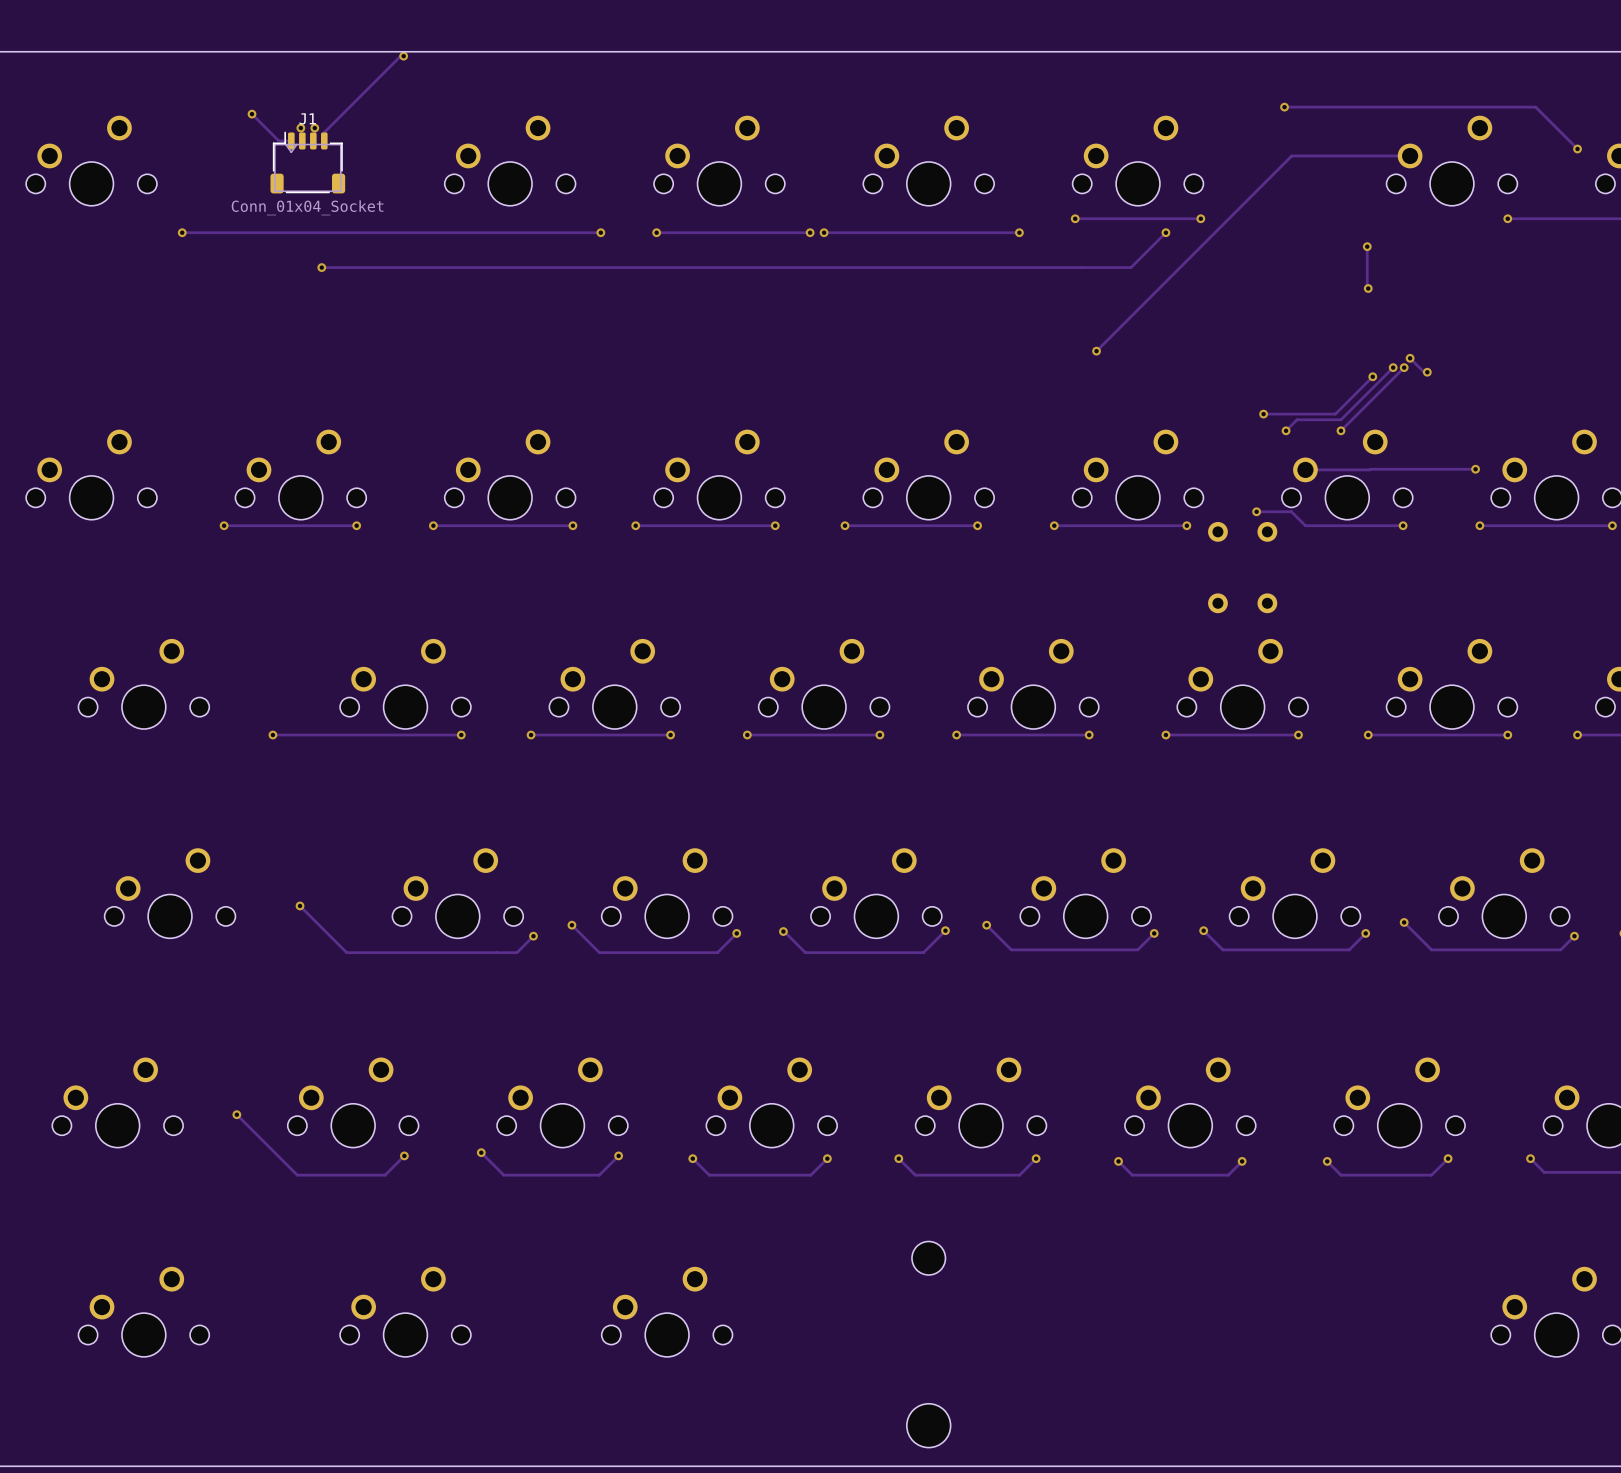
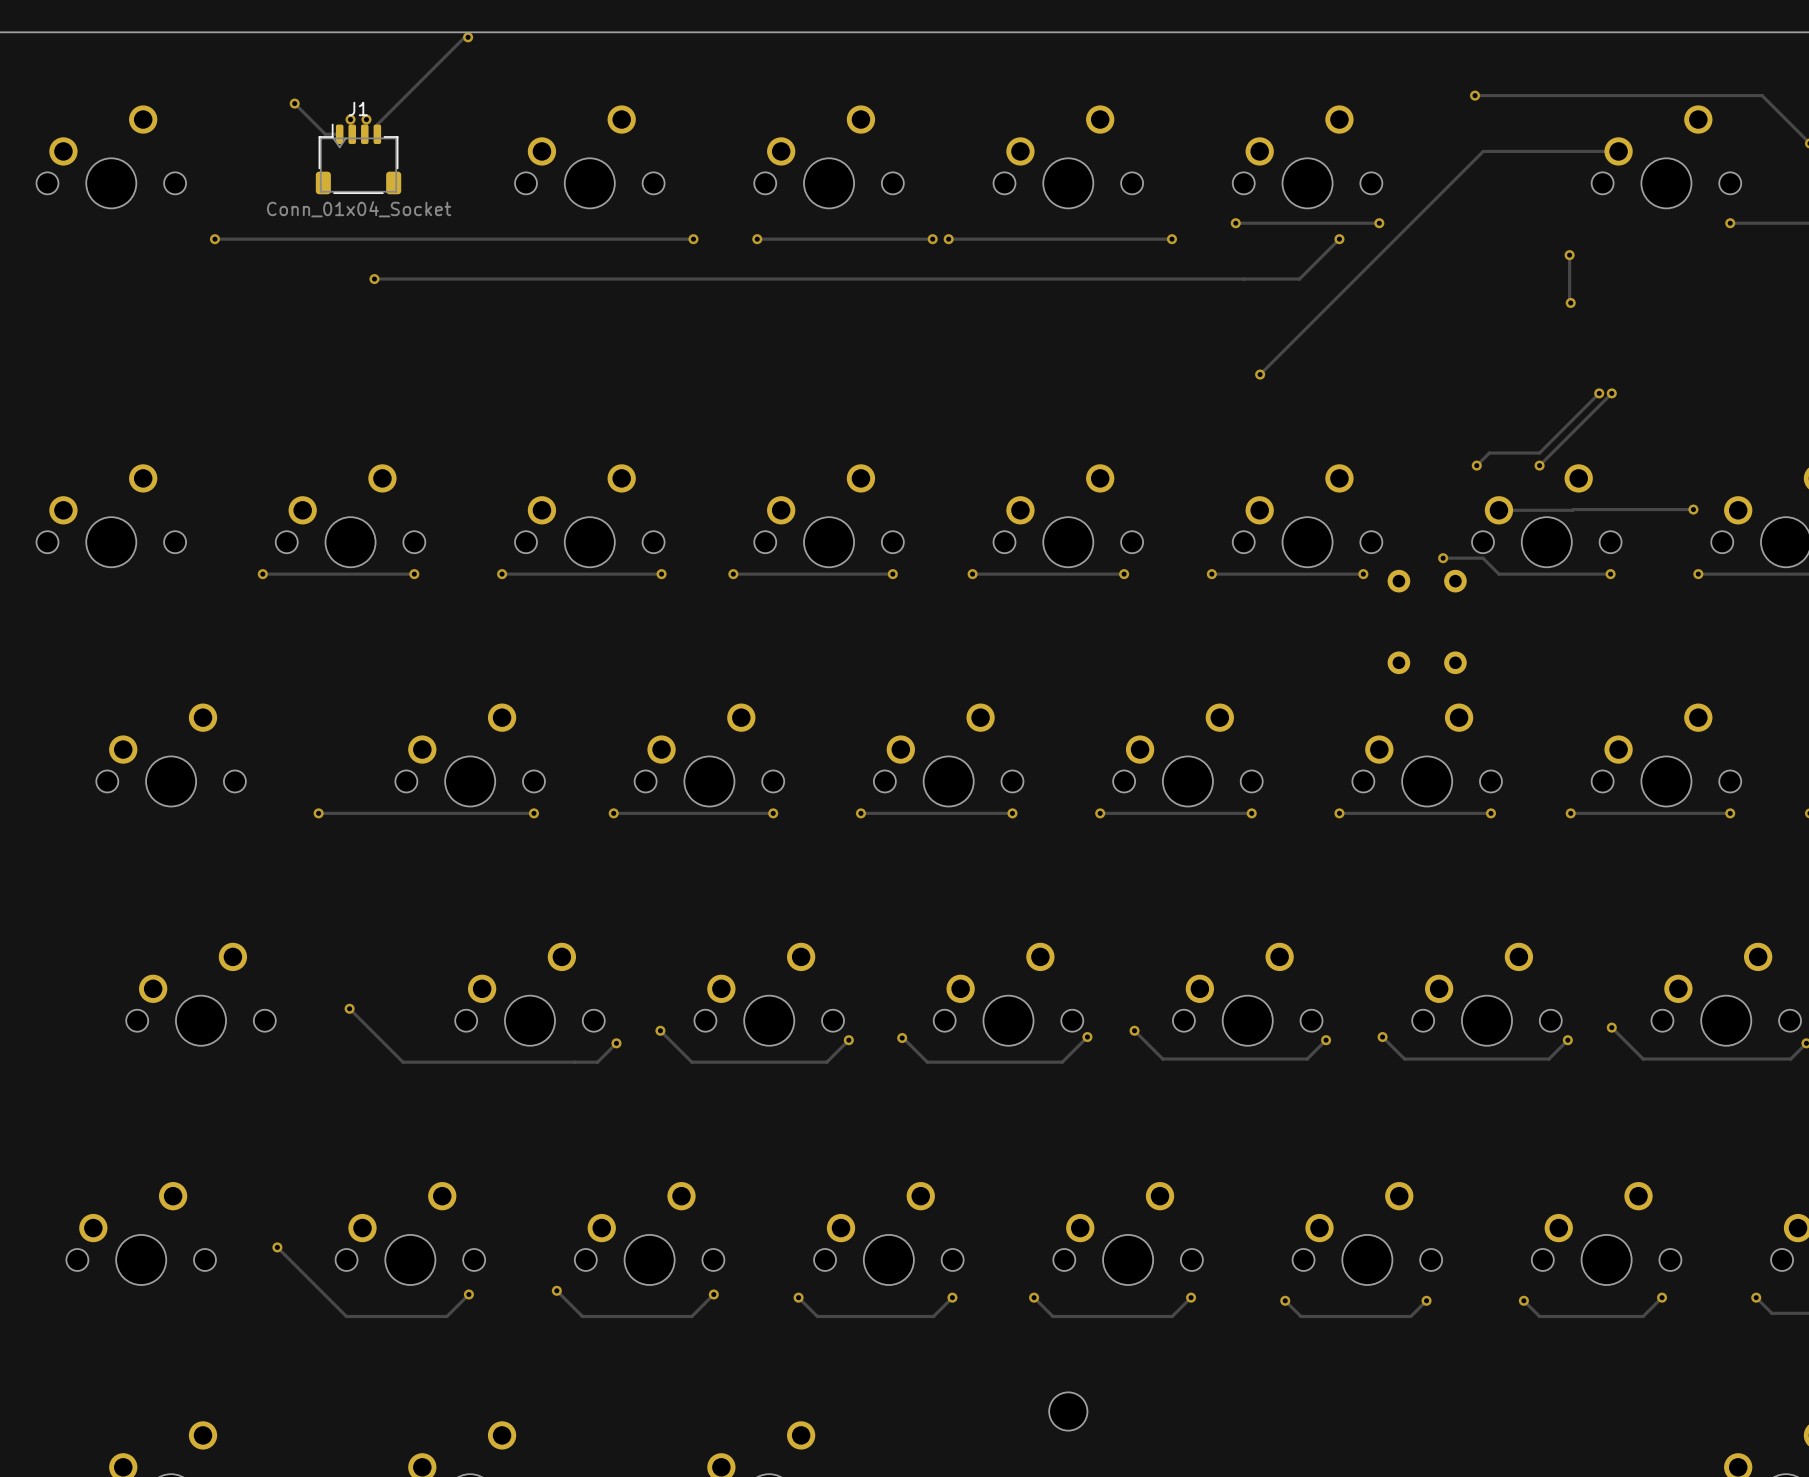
track: (1410, 358) (1424, 372) (1427, 372) -> none
via: (1410, 358) -> none
via: (1427, 372) -> none
track: (1372, 376) (1335, 414) (1263, 414) -> none
via: (1372, 376) -> none
via: (1263, 414) -> none

